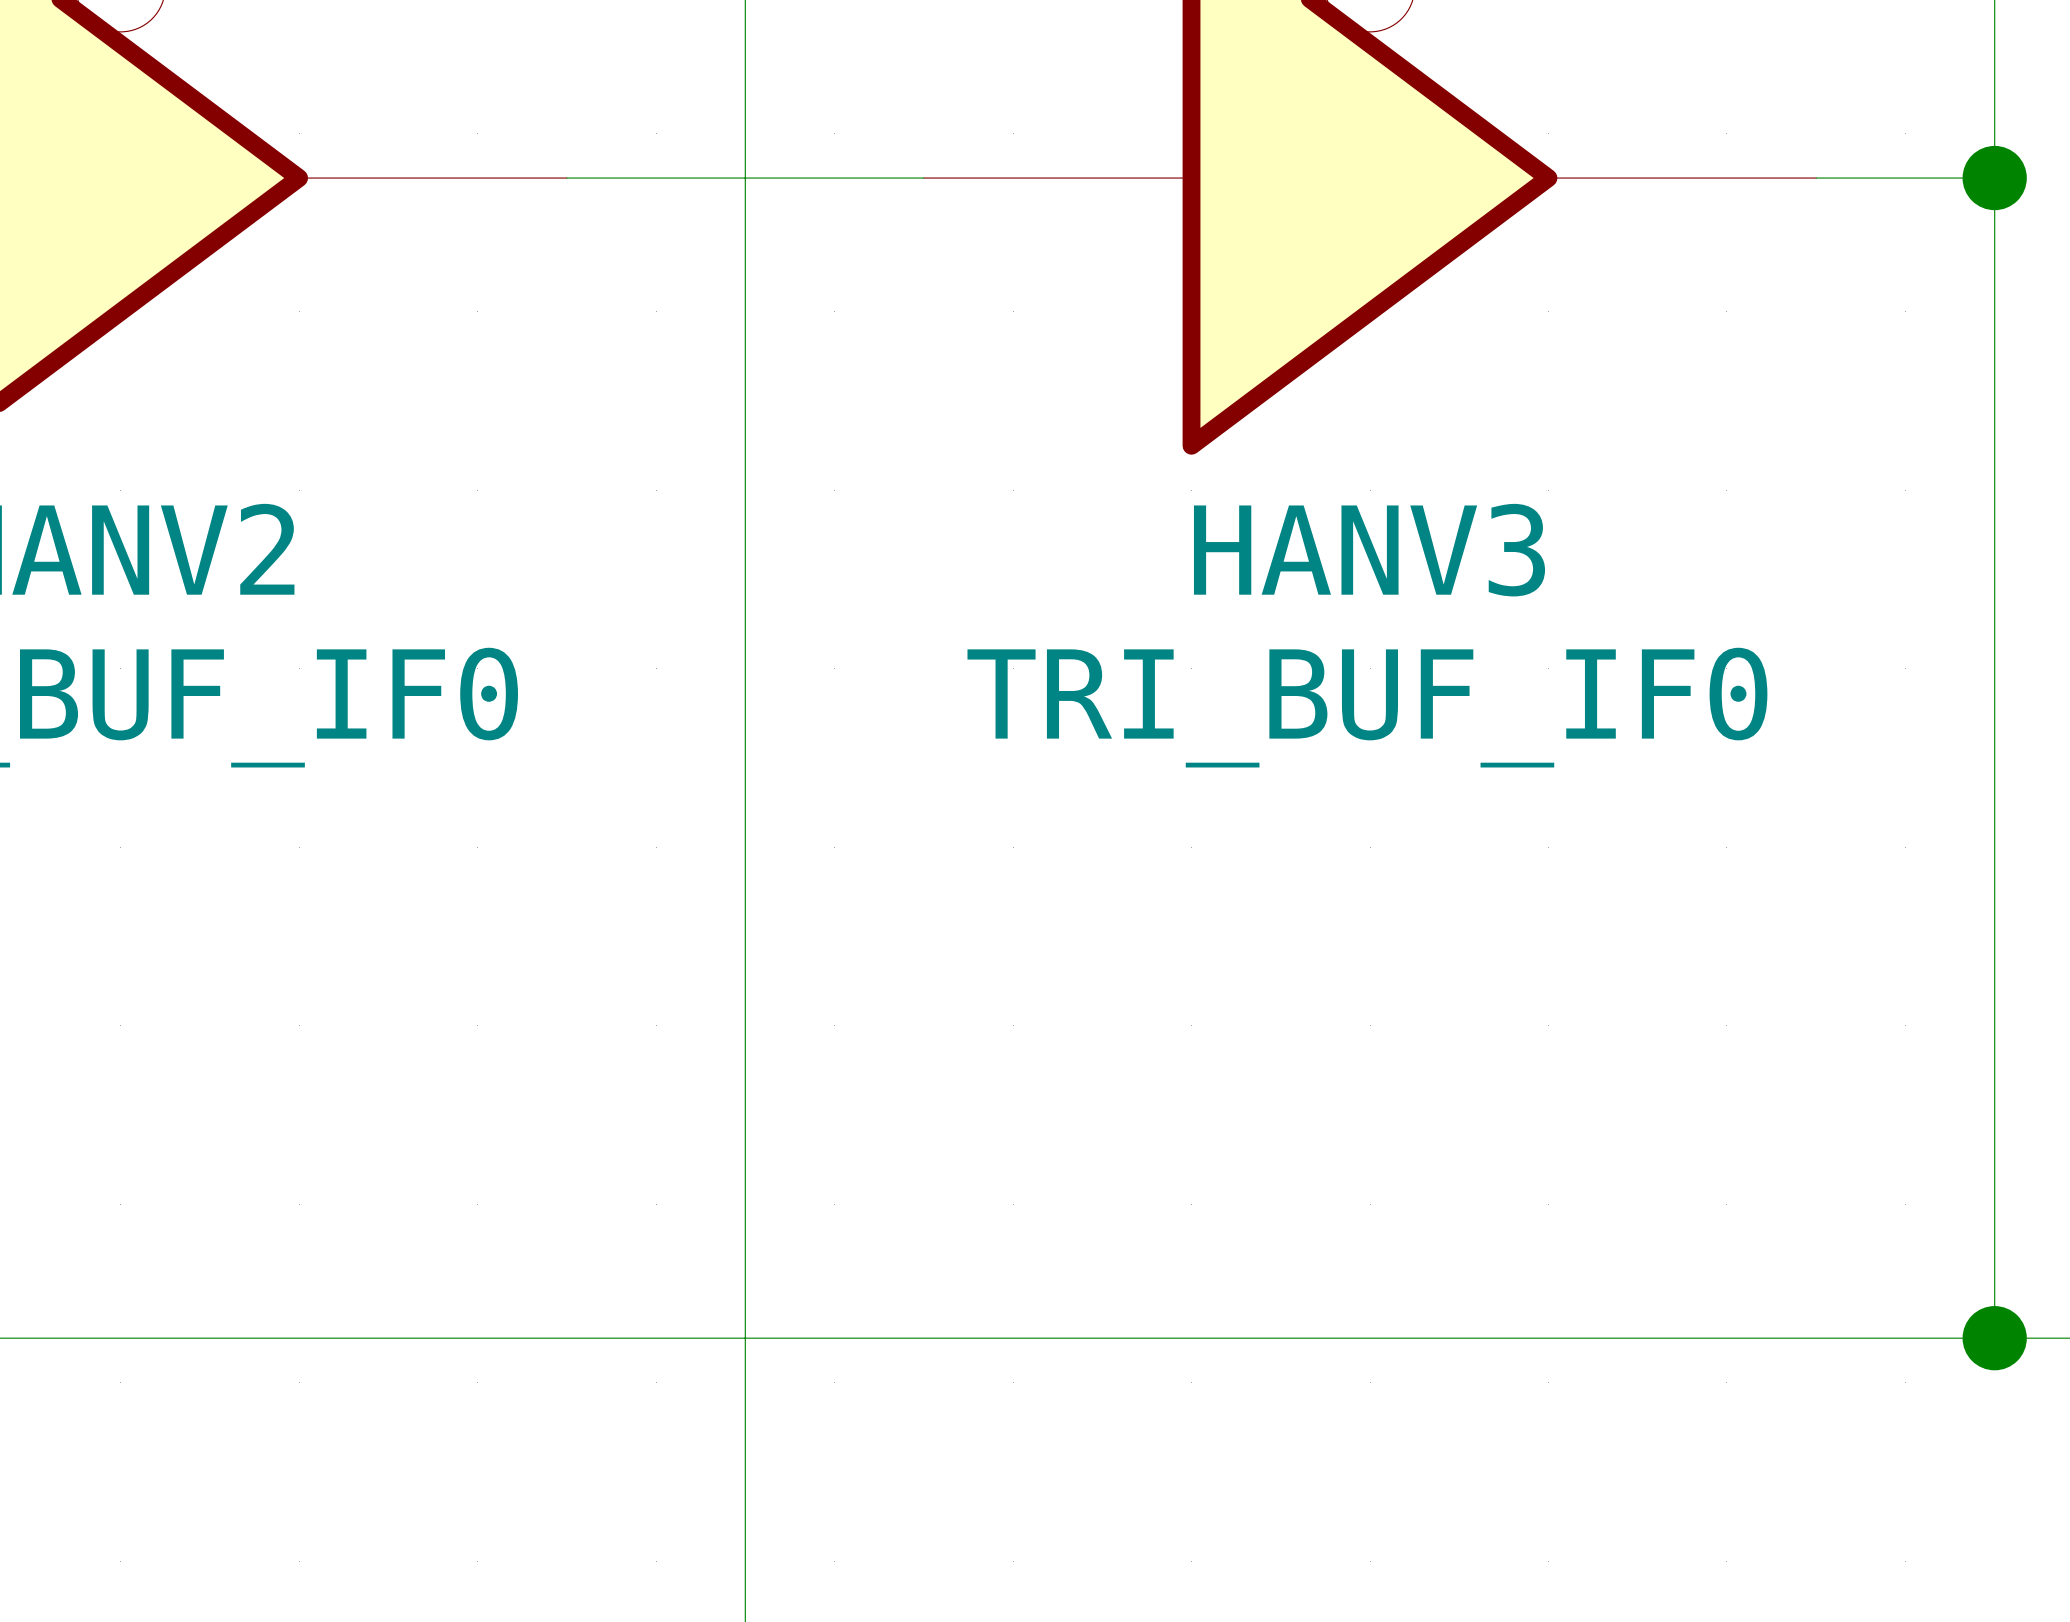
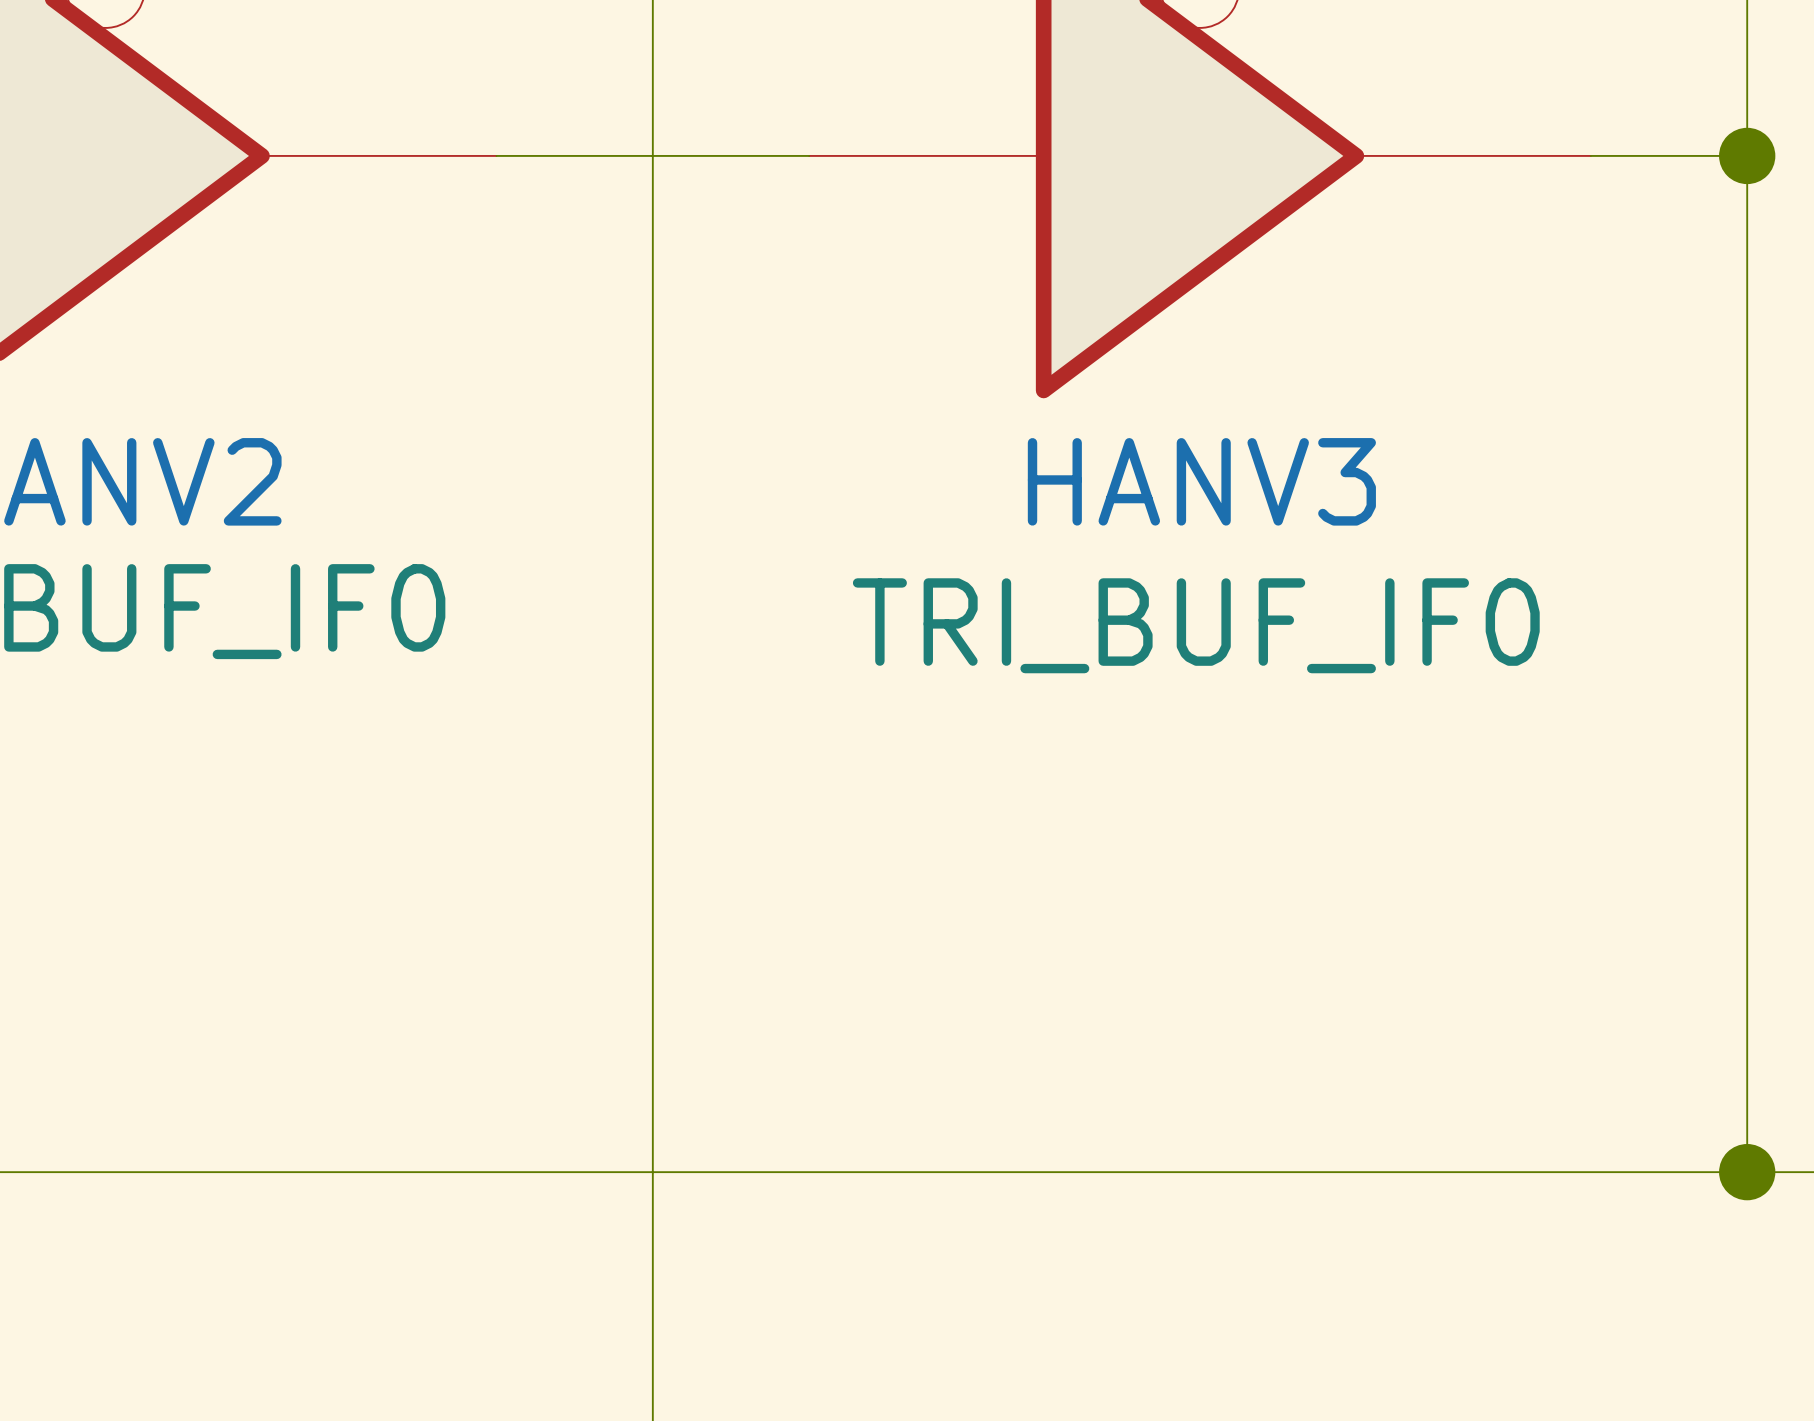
HANV3 value position: TRI_BUF_IF0 (1367, 707) -> TRI_BUF_IF0 (1196, 625)

